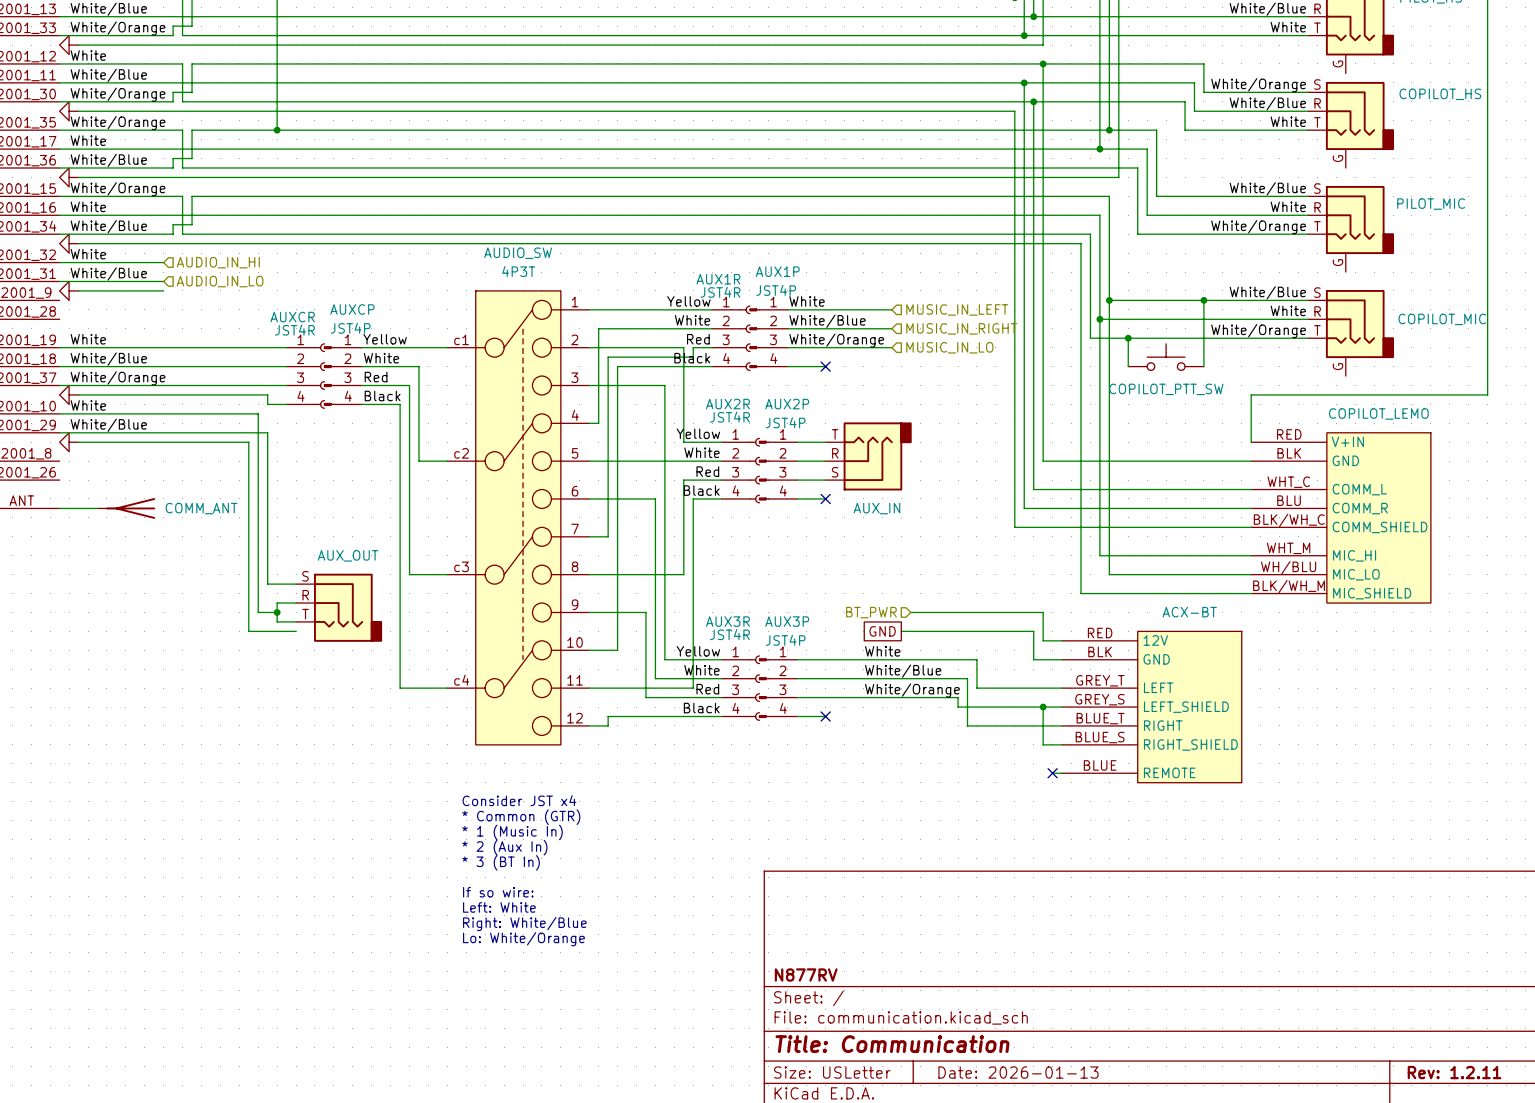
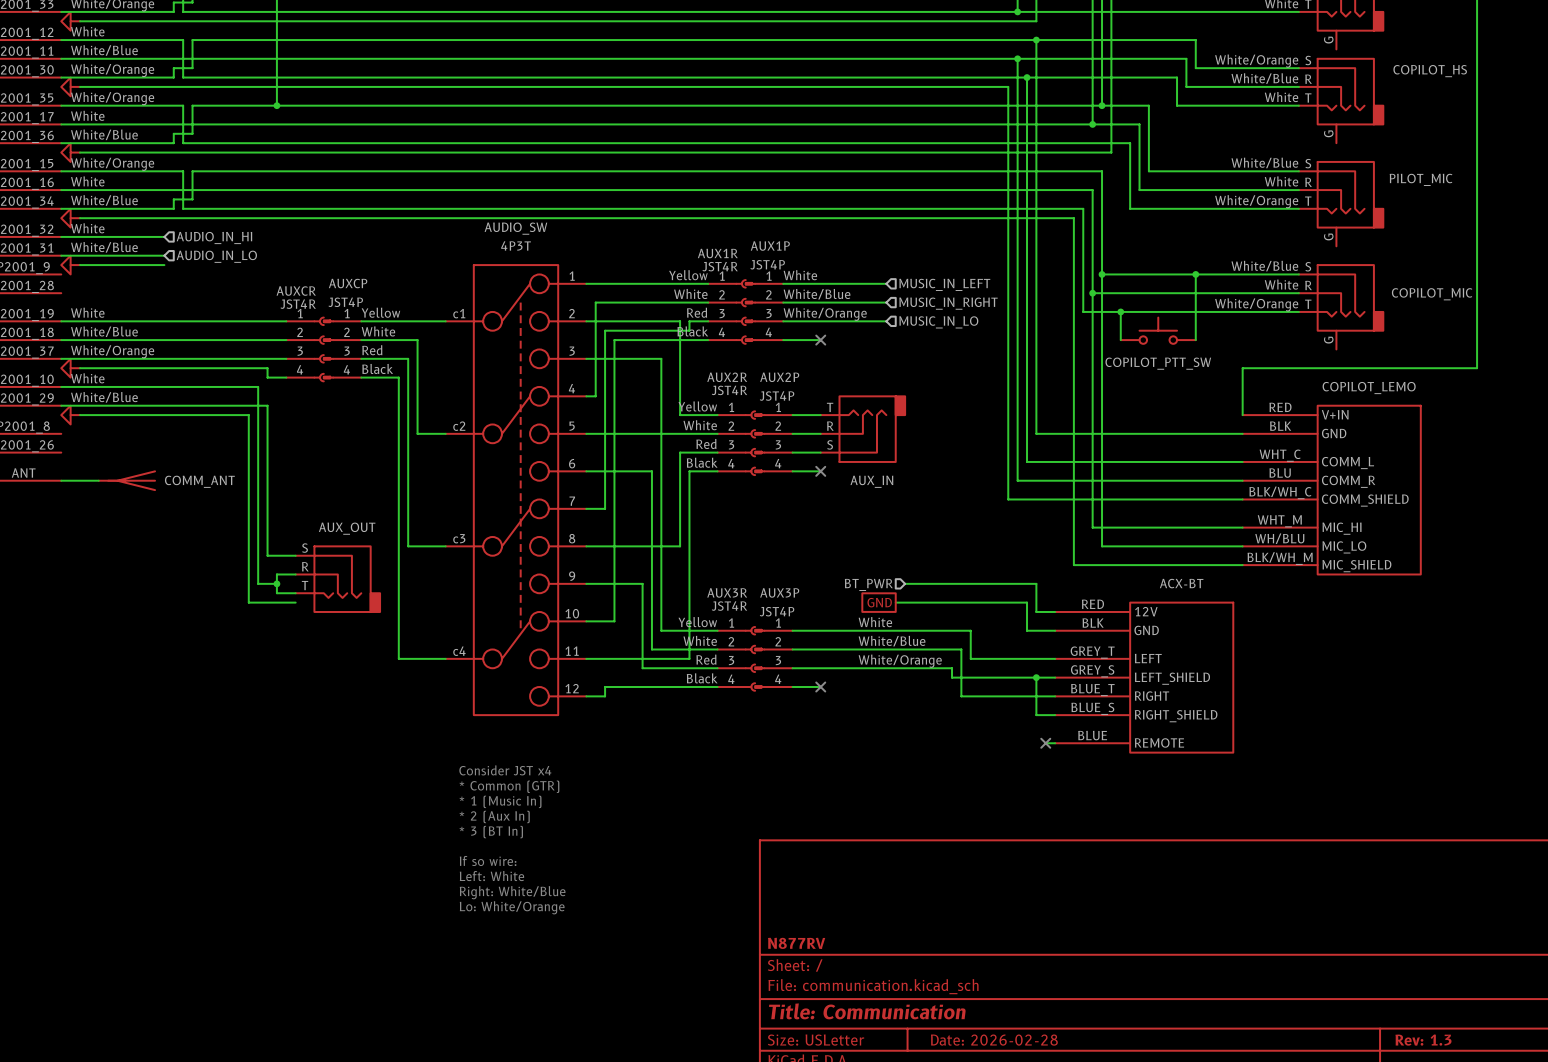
title block: Date: 2026-01-13 (1018, 1072) -> Date: 2026-02-28 (994, 1040)
title block: Rev: 1.2.11 (1454, 1072) -> Rev: 1.3 (1423, 1040)

